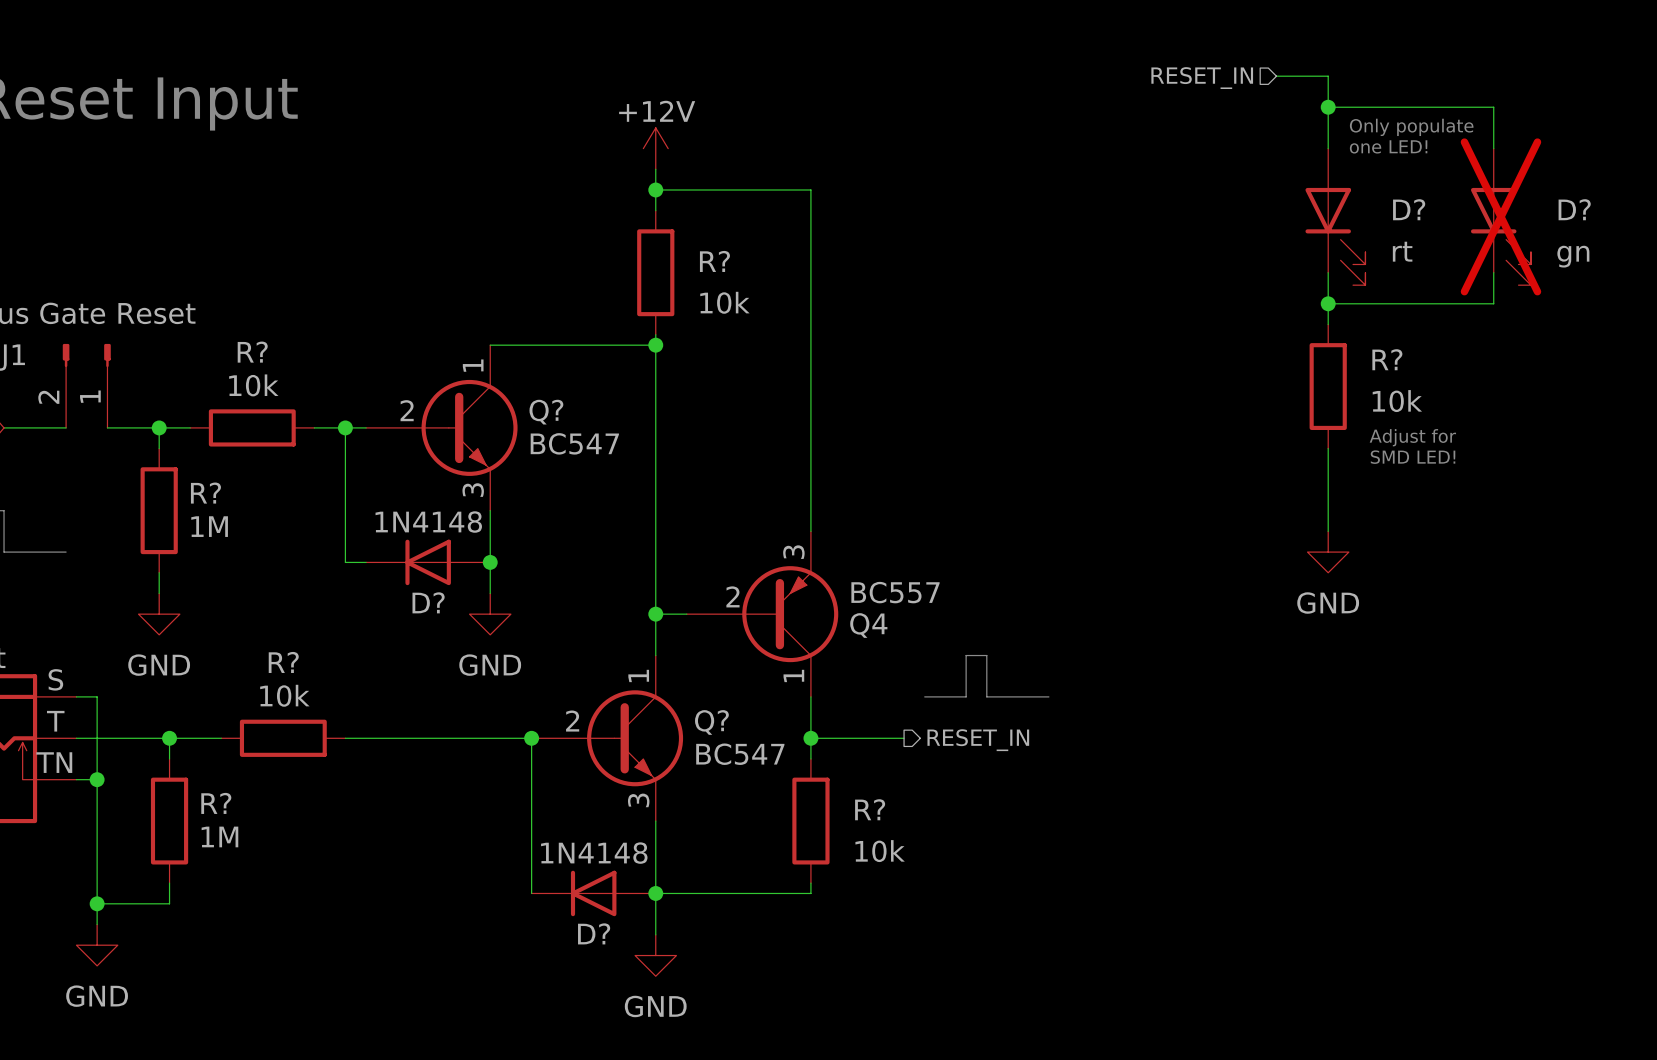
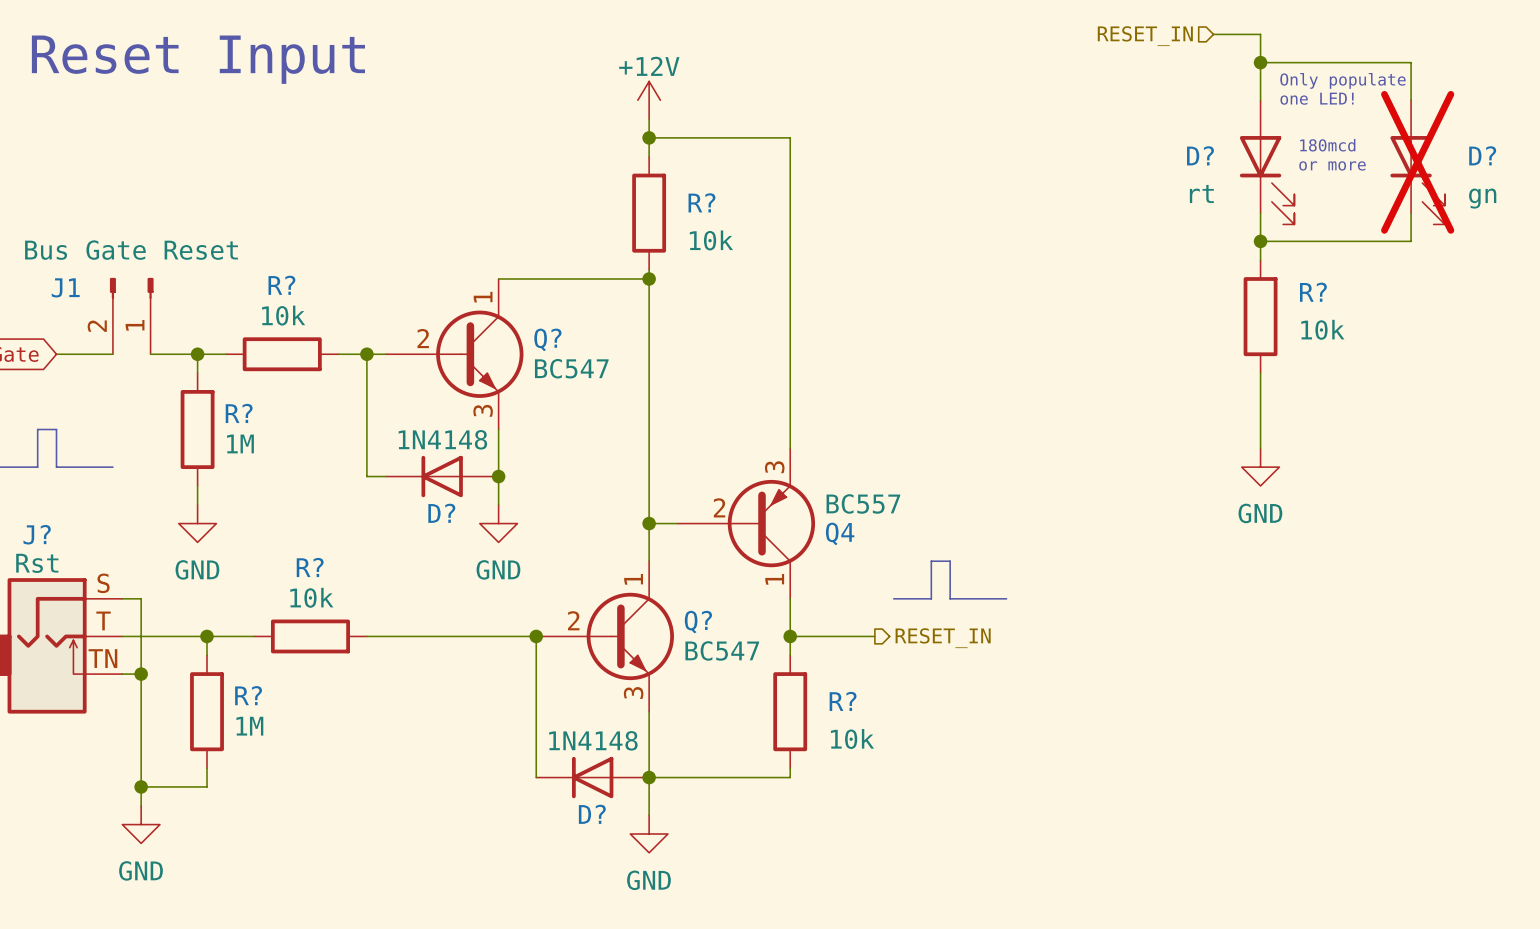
text: none -> 180mcd (1327, 145)
D? name position: D? (1409, 209) -> D? (1200, 155)
text: none -> or more (1332, 165)
D? value position: rt (1402, 251) -> rt (1201, 193)
text: Adjust for (1412, 437) -> none
text: SMD LED! (1413, 457) -> none

